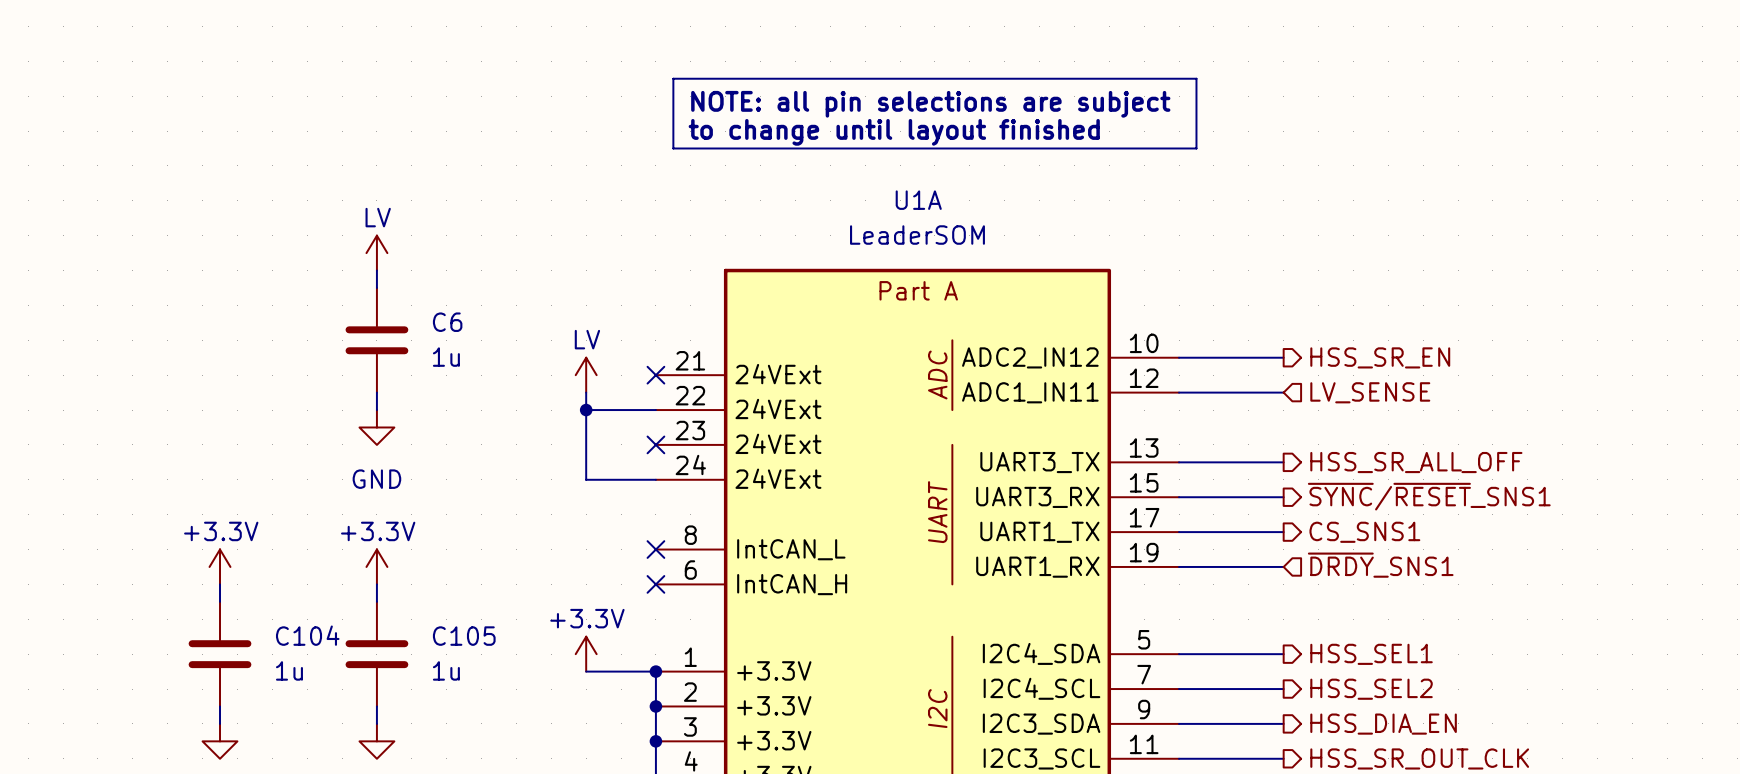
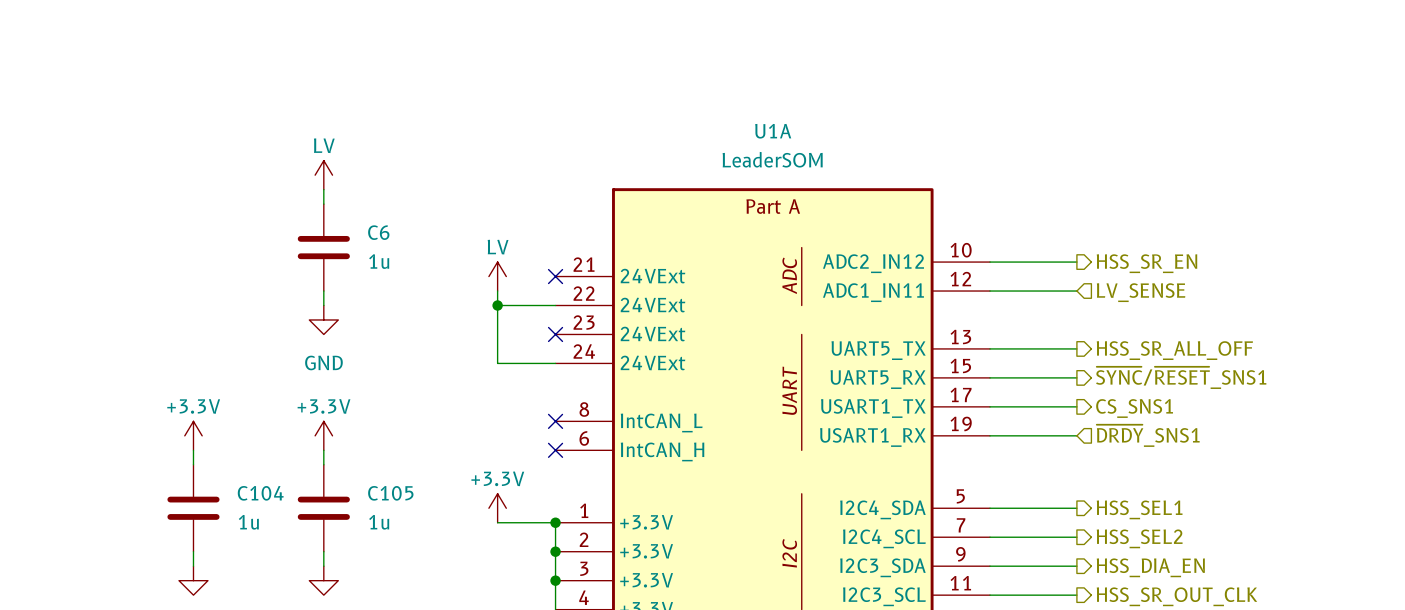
line: (673, 78) (1196, 78) (1196, 148) (673, 148) (673, 78) -> none
text: NOTE: all pin selections are subject (930, 104) -> none
text: to change until layout finished (894, 132) -> none
U1A pin name: UART3_TX (1039, 462) -> UART5_TX (878, 350)
U1A pin name: UART3_RX (1037, 497) -> UART5_RX (878, 379)
U1A pin name: UART1_TX (1039, 532) -> USART1_TX (873, 408)
U1A pin name: UART1_RX (1037, 567) -> USART1_RX (872, 437)

